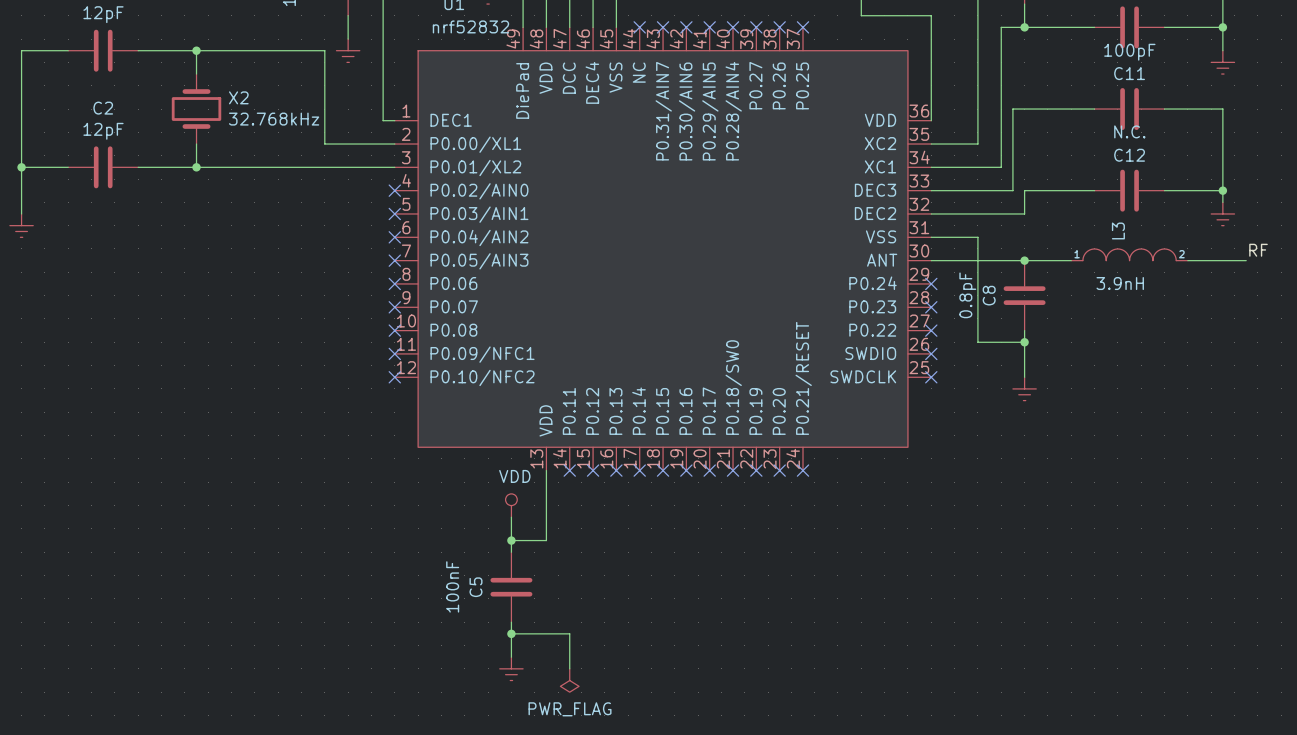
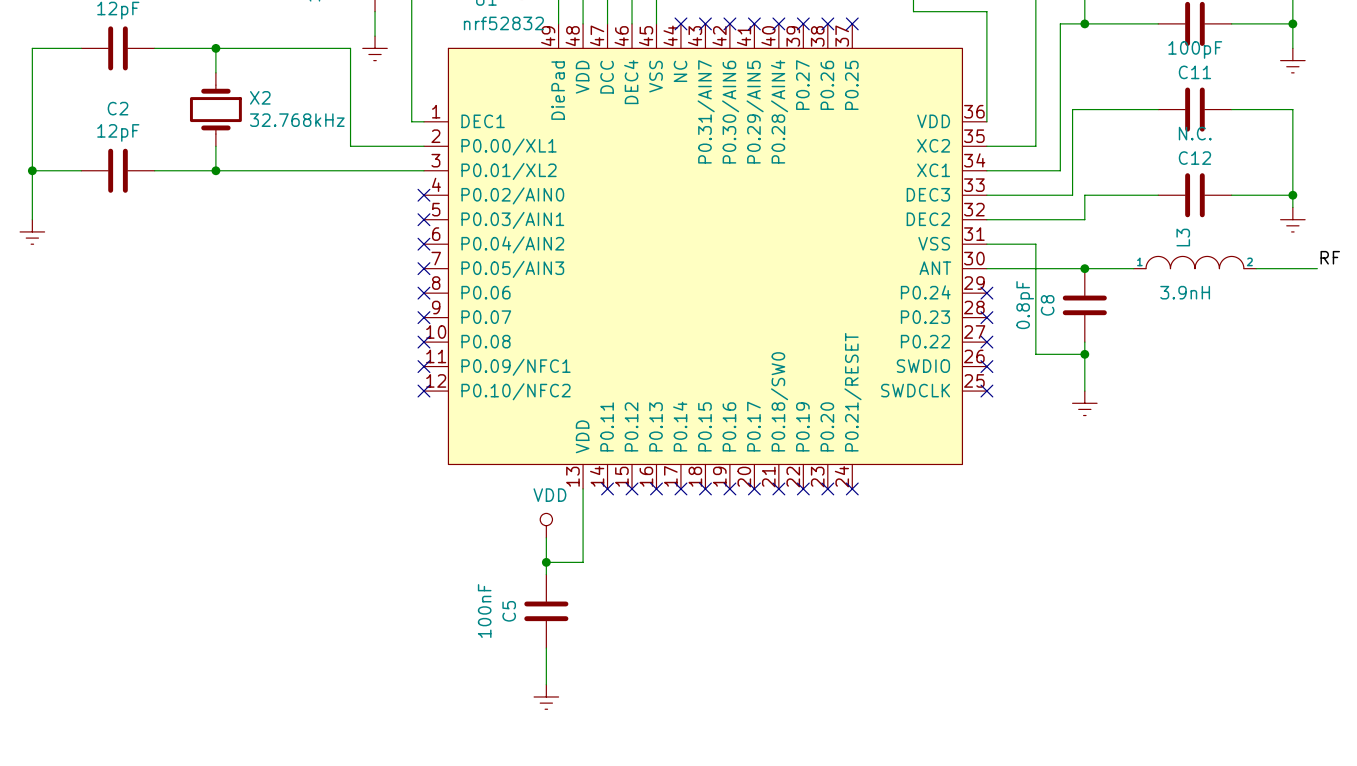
wire: (511, 633) (569, 633) (569, 668) -> none
junction: (511, 633) -> none
power symbol: PWR_FLAG (569, 680) -> none

